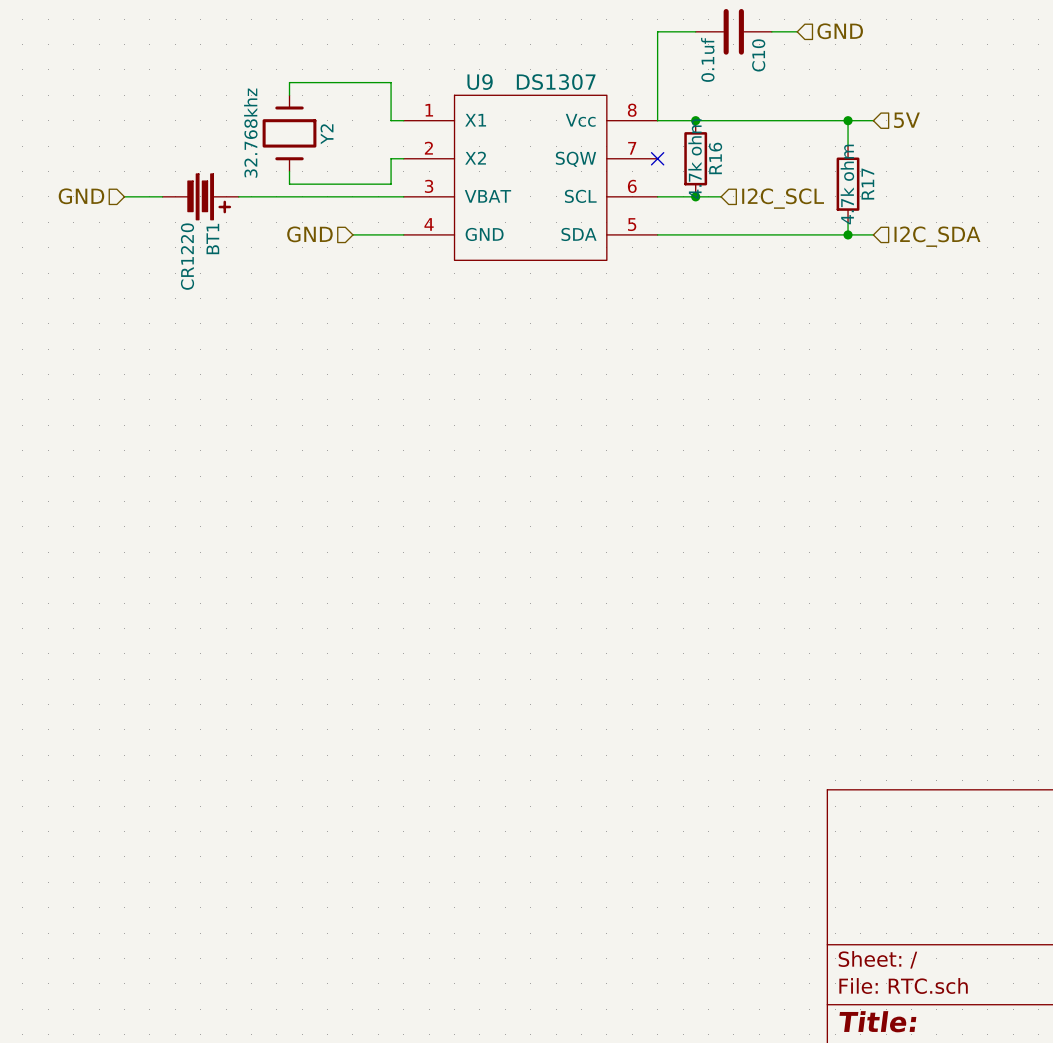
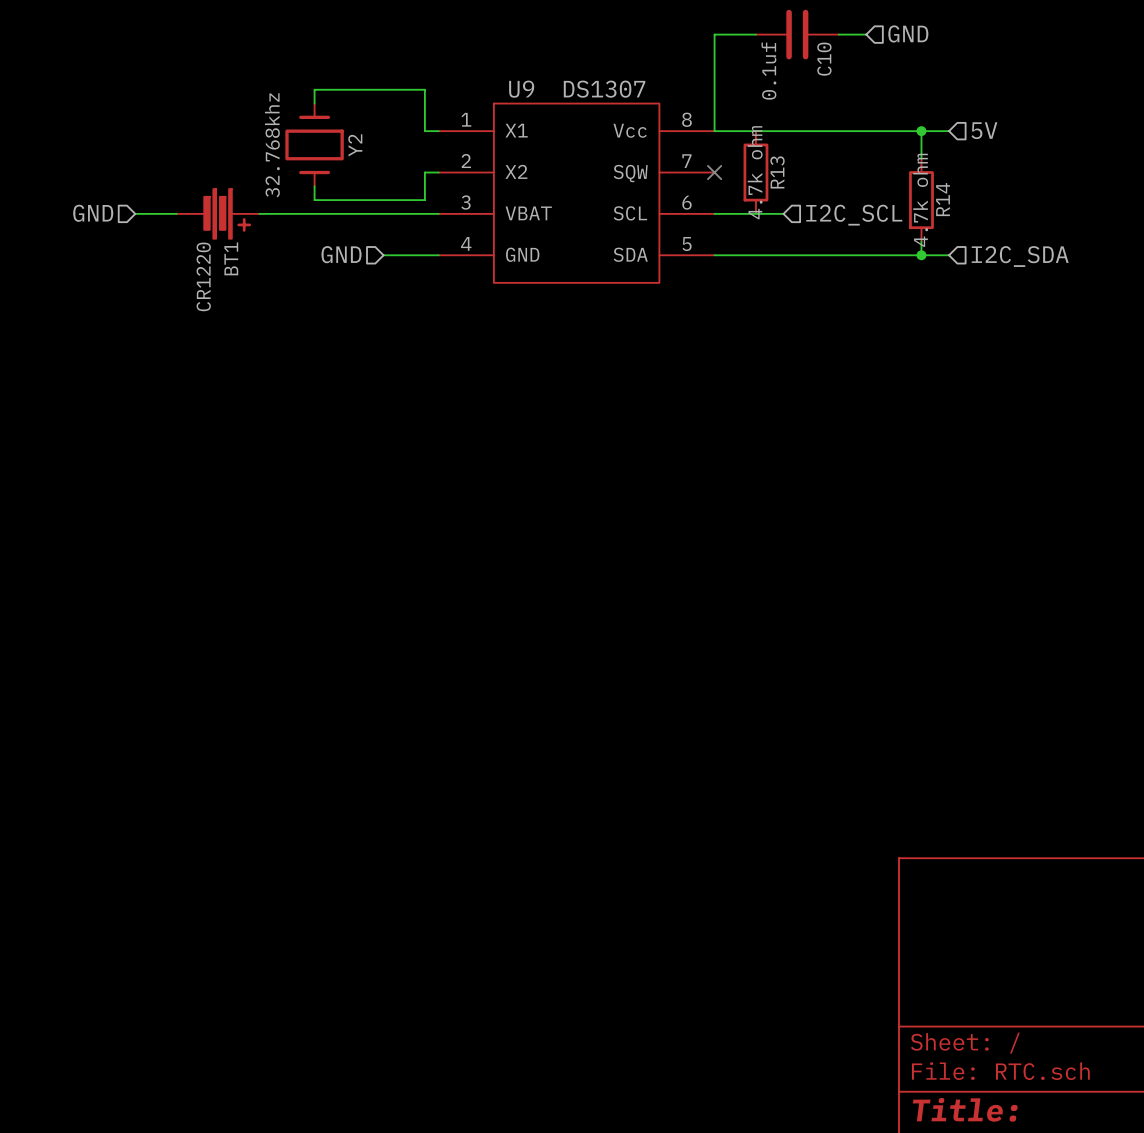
junction: (695, 120) -> none
R16 name: R16 (715, 158) -> R13 (777, 172)
R17 name: R17 (867, 184) -> R14 (943, 199)
junction: (695, 196) -> none

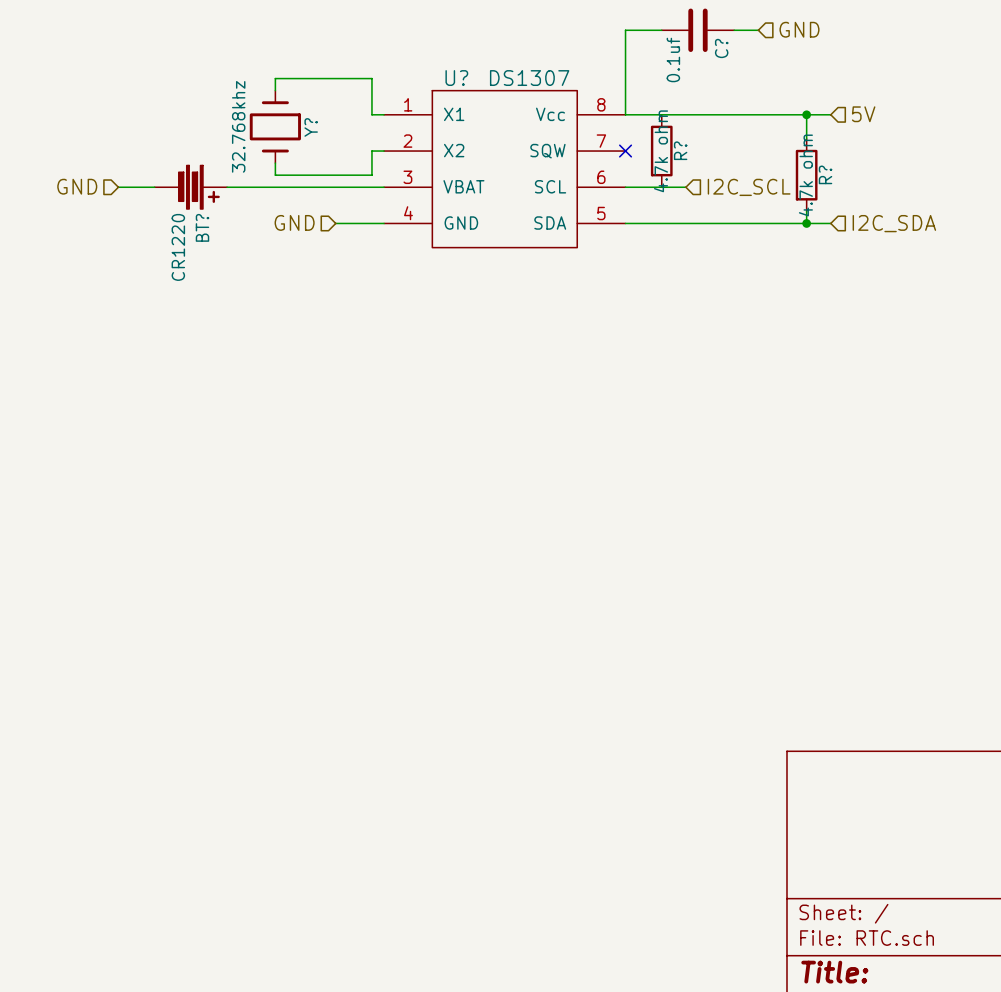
C10 name: C10 (824, 59) -> C? (721, 48)
U9 name: U9 (521, 89) -> U? (456, 78)
Y2 name: Y2 (355, 145) -> Y? (311, 127)
R13 name: R13 (777, 172) -> R? (680, 150)
R14 name: R14 (943, 199) -> R? (825, 174)
BT1 name: BT1 (231, 258) -> BT? (202, 227)

